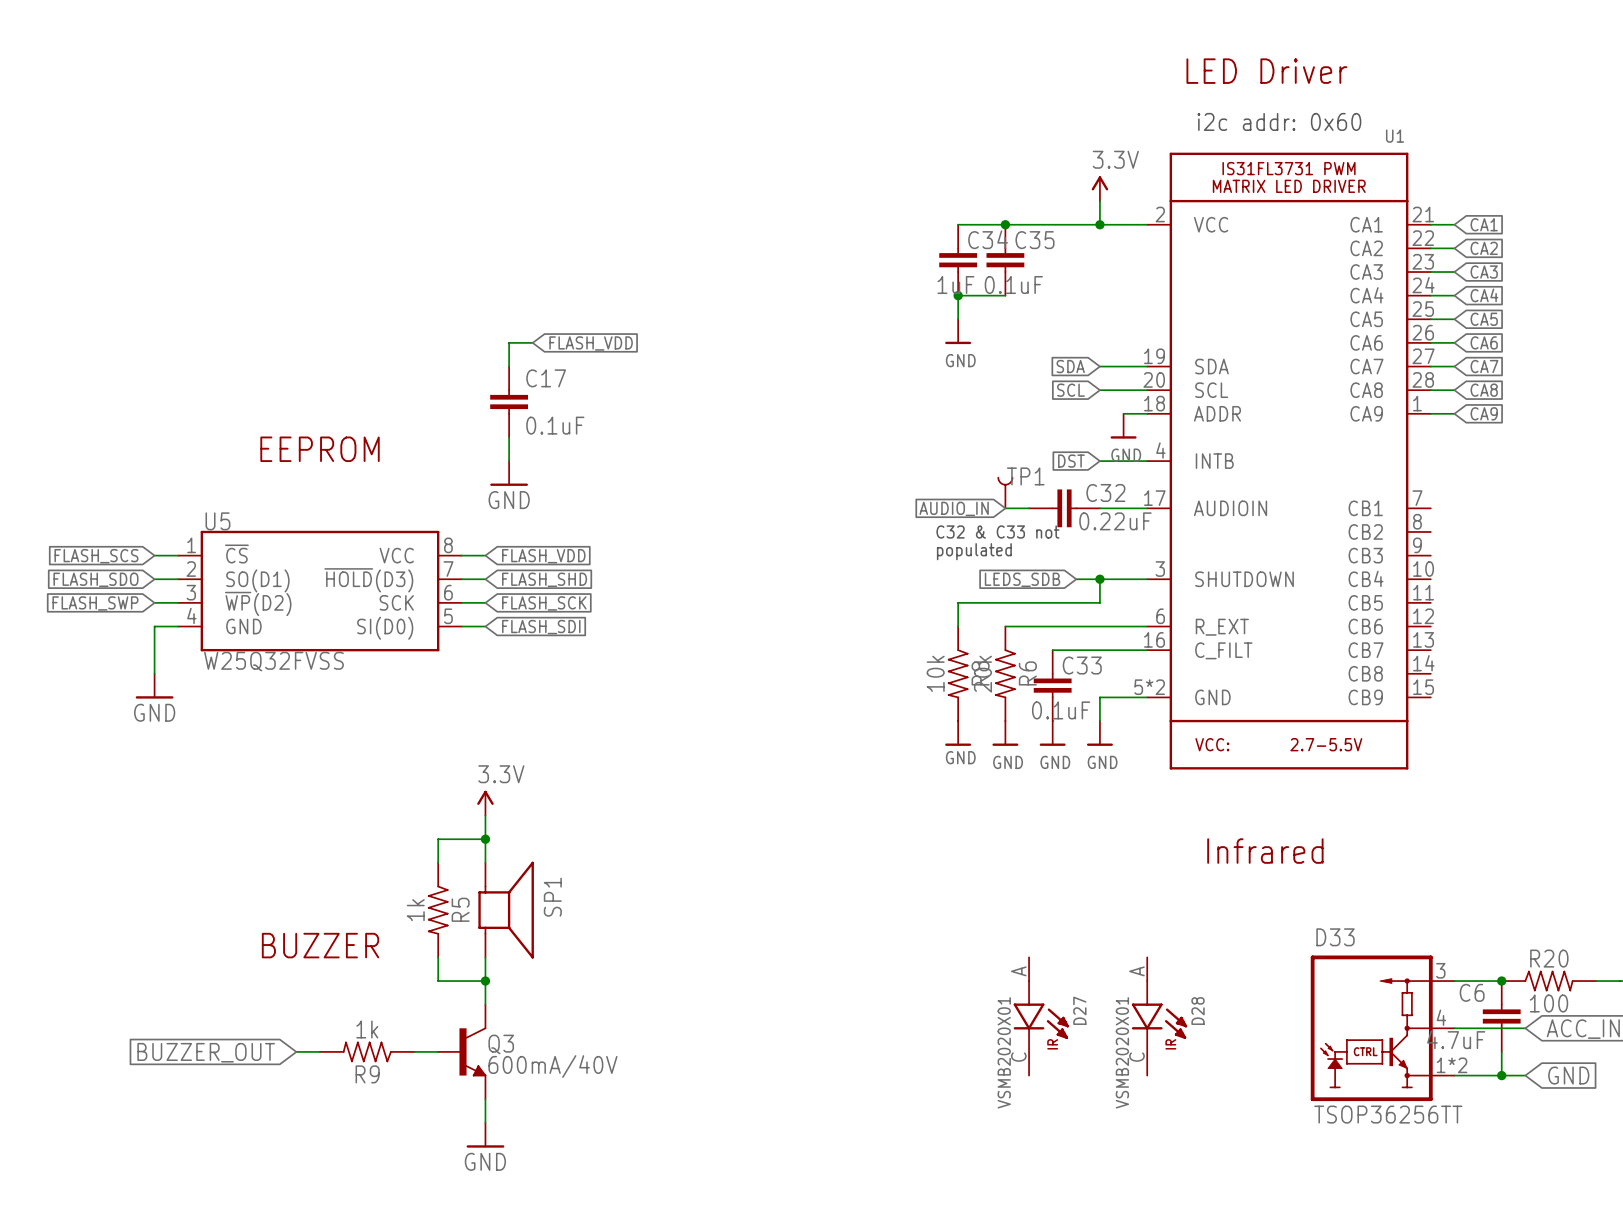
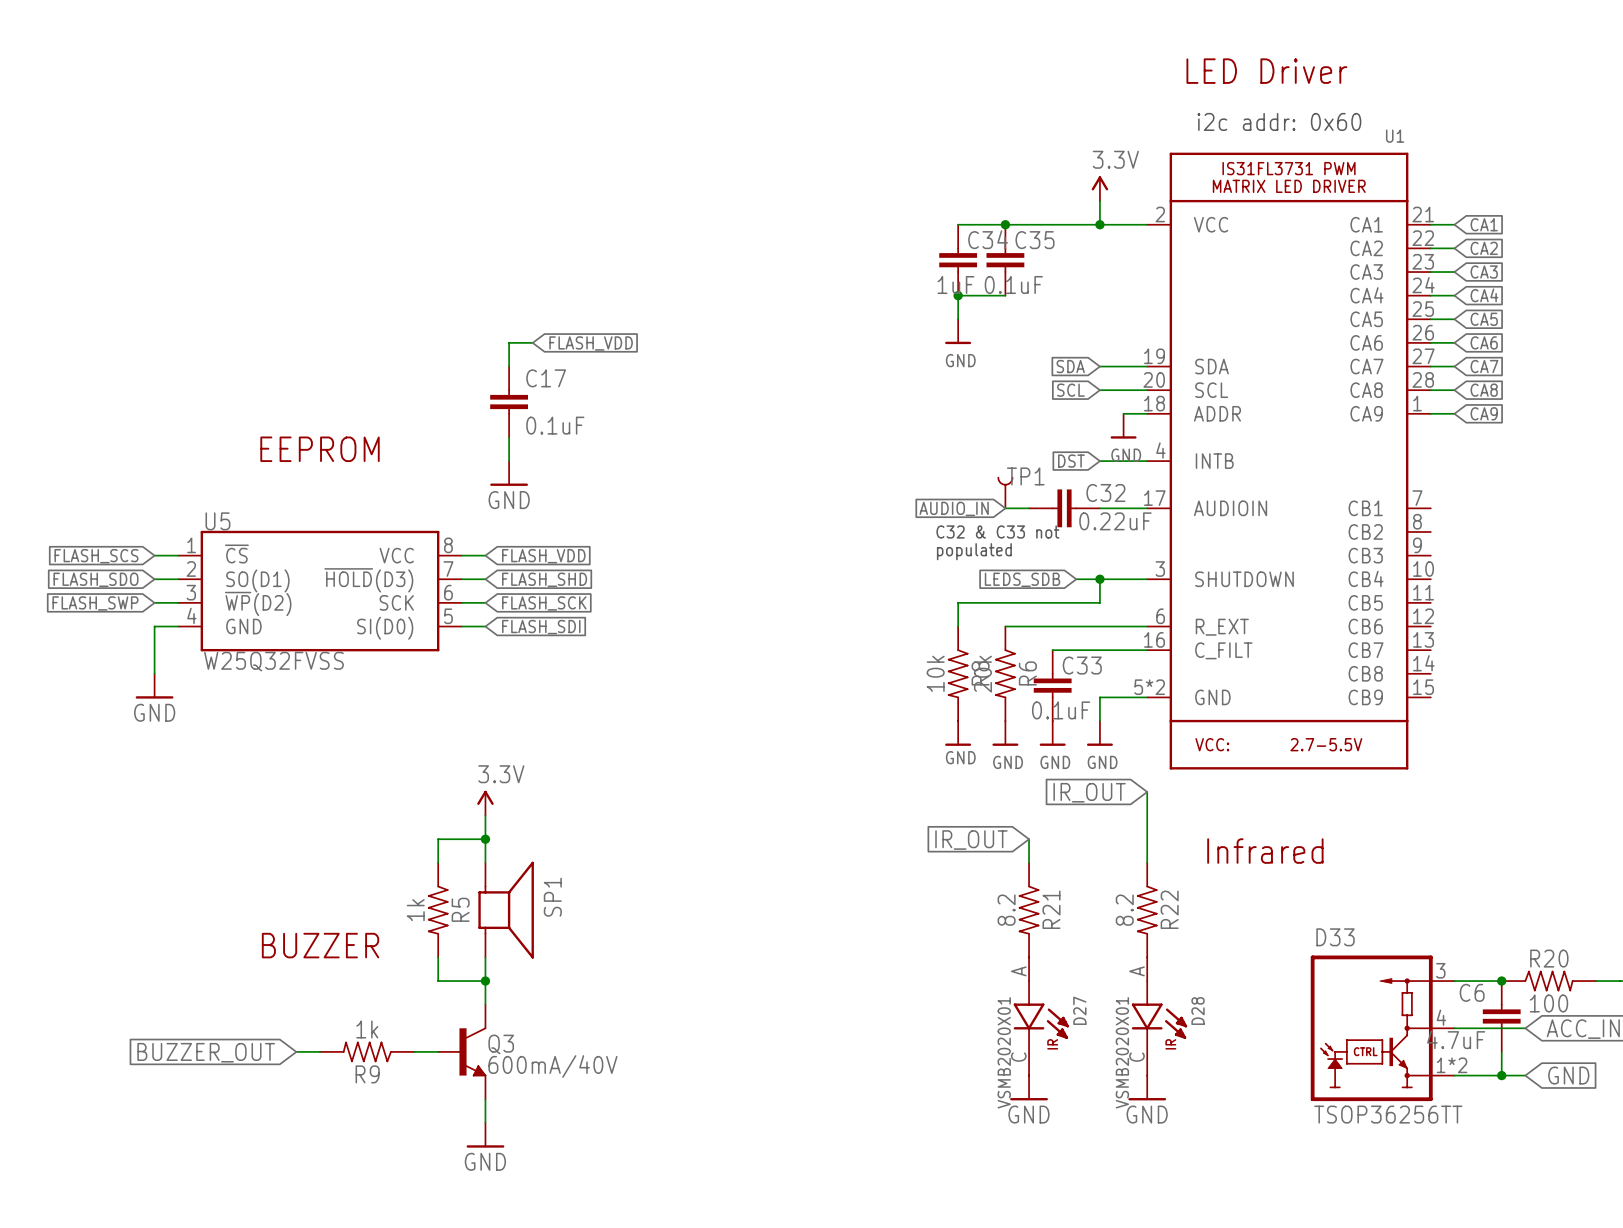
wire: none -> (1147, 791) (1147, 862)
global label: none -> IR_OUT (1089, 792)
wire: none -> (1029, 839) (1029, 862)
global label: none -> IR_OUT (971, 840)
R21: none -> 8.2 (1029, 910)
R22: none -> 8.2 (1147, 910)
power symbol: none -> GND (1029, 1087)
power symbol: none -> GND (1147, 1087)

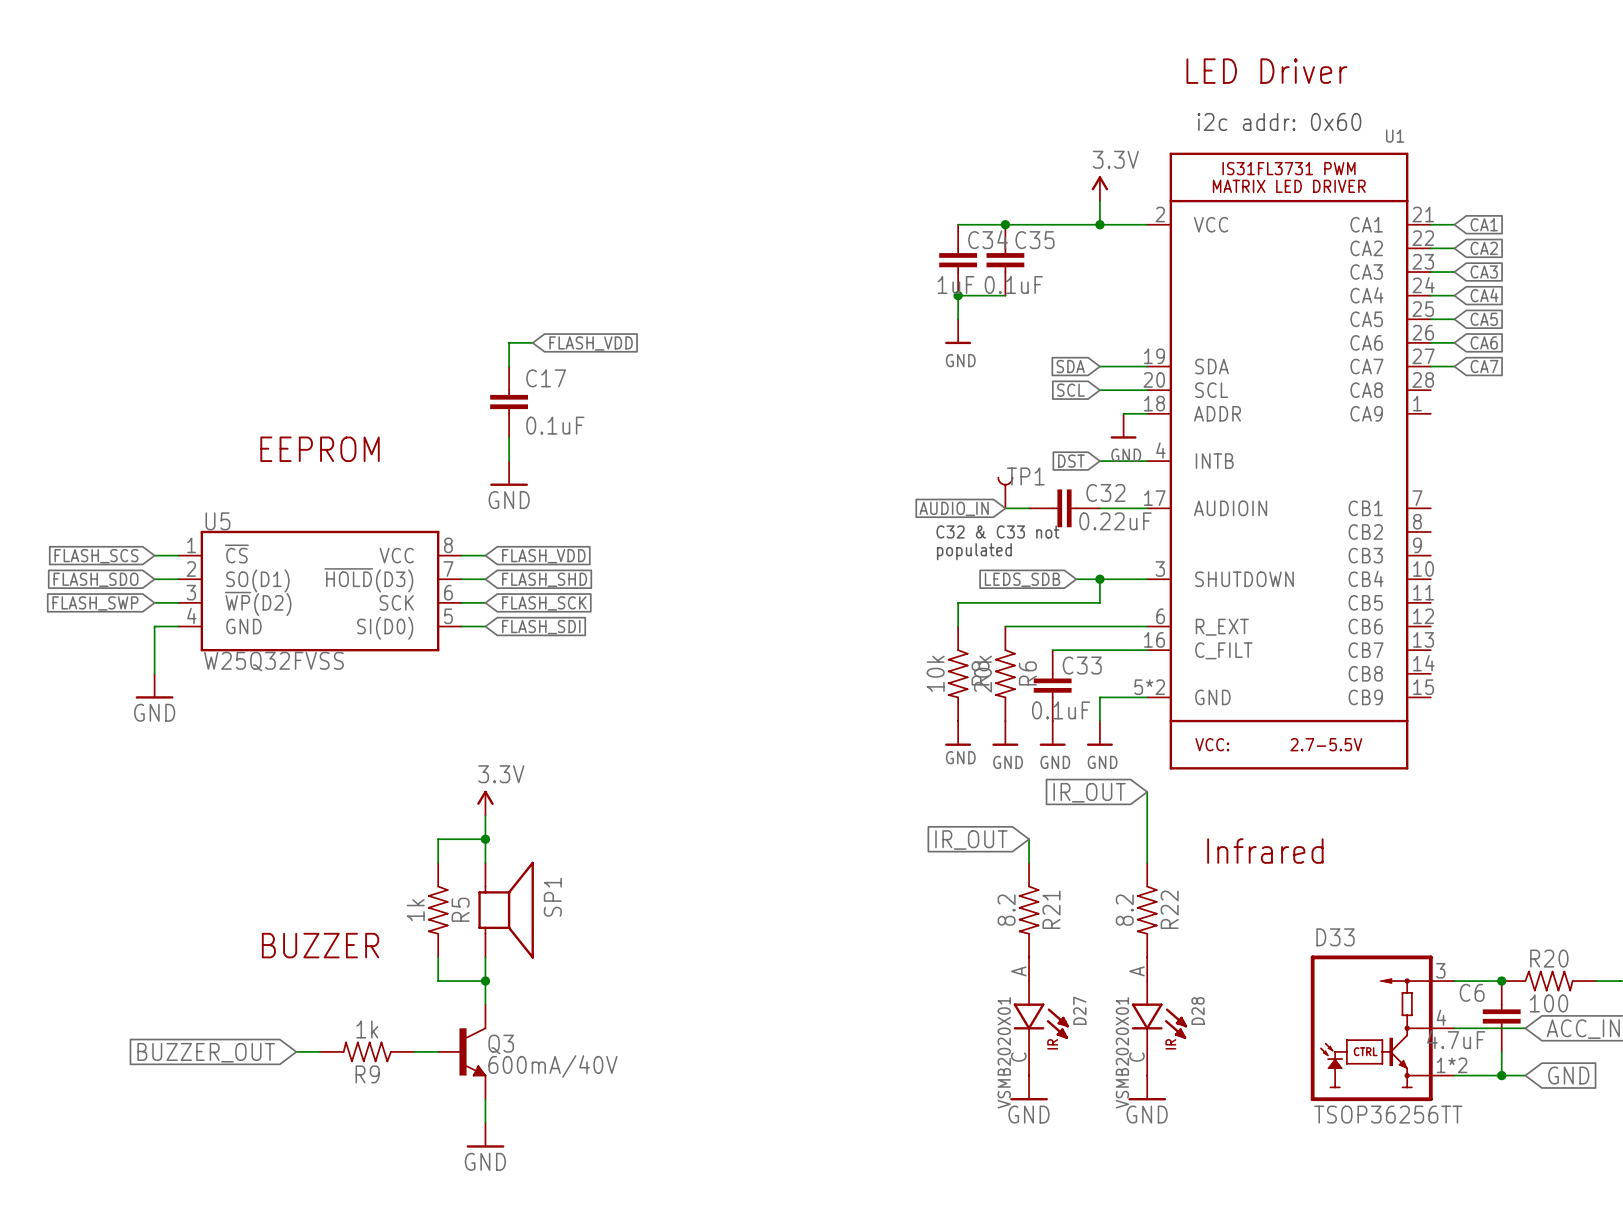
wire: (1430, 390) (1454, 390) -> none
global label: CA8 (1484, 390) -> none
wire: (1430, 413) (1454, 413) -> none
global label: CA9 (1484, 413) -> none

